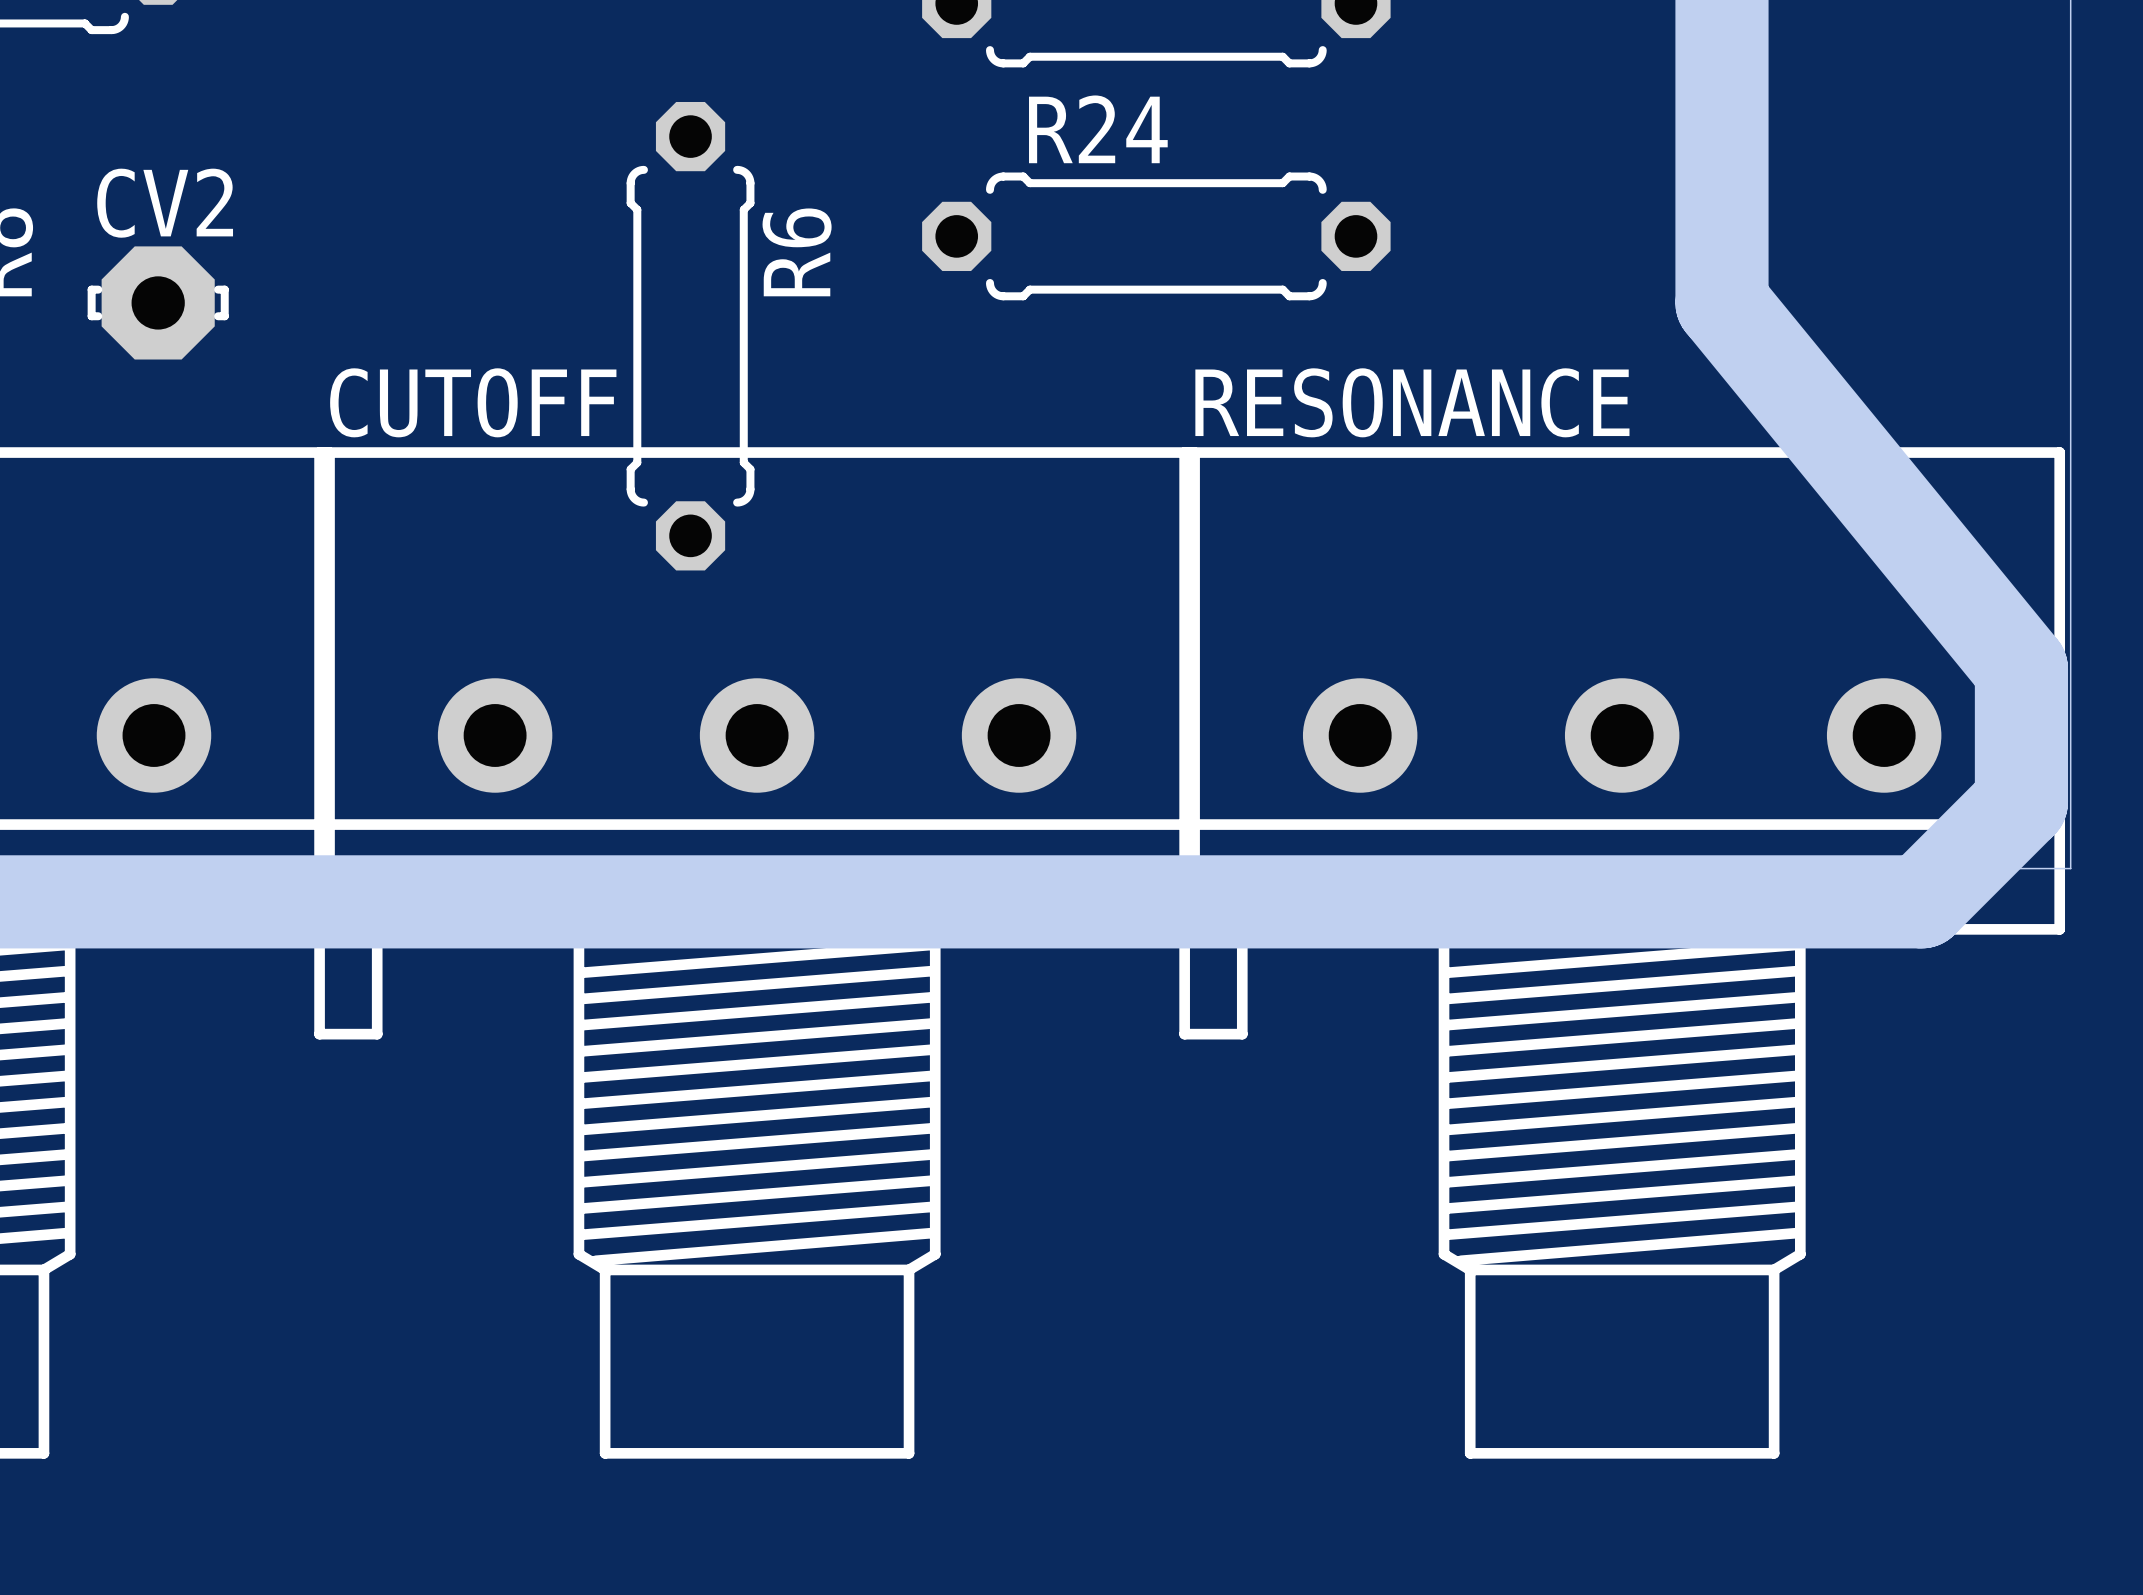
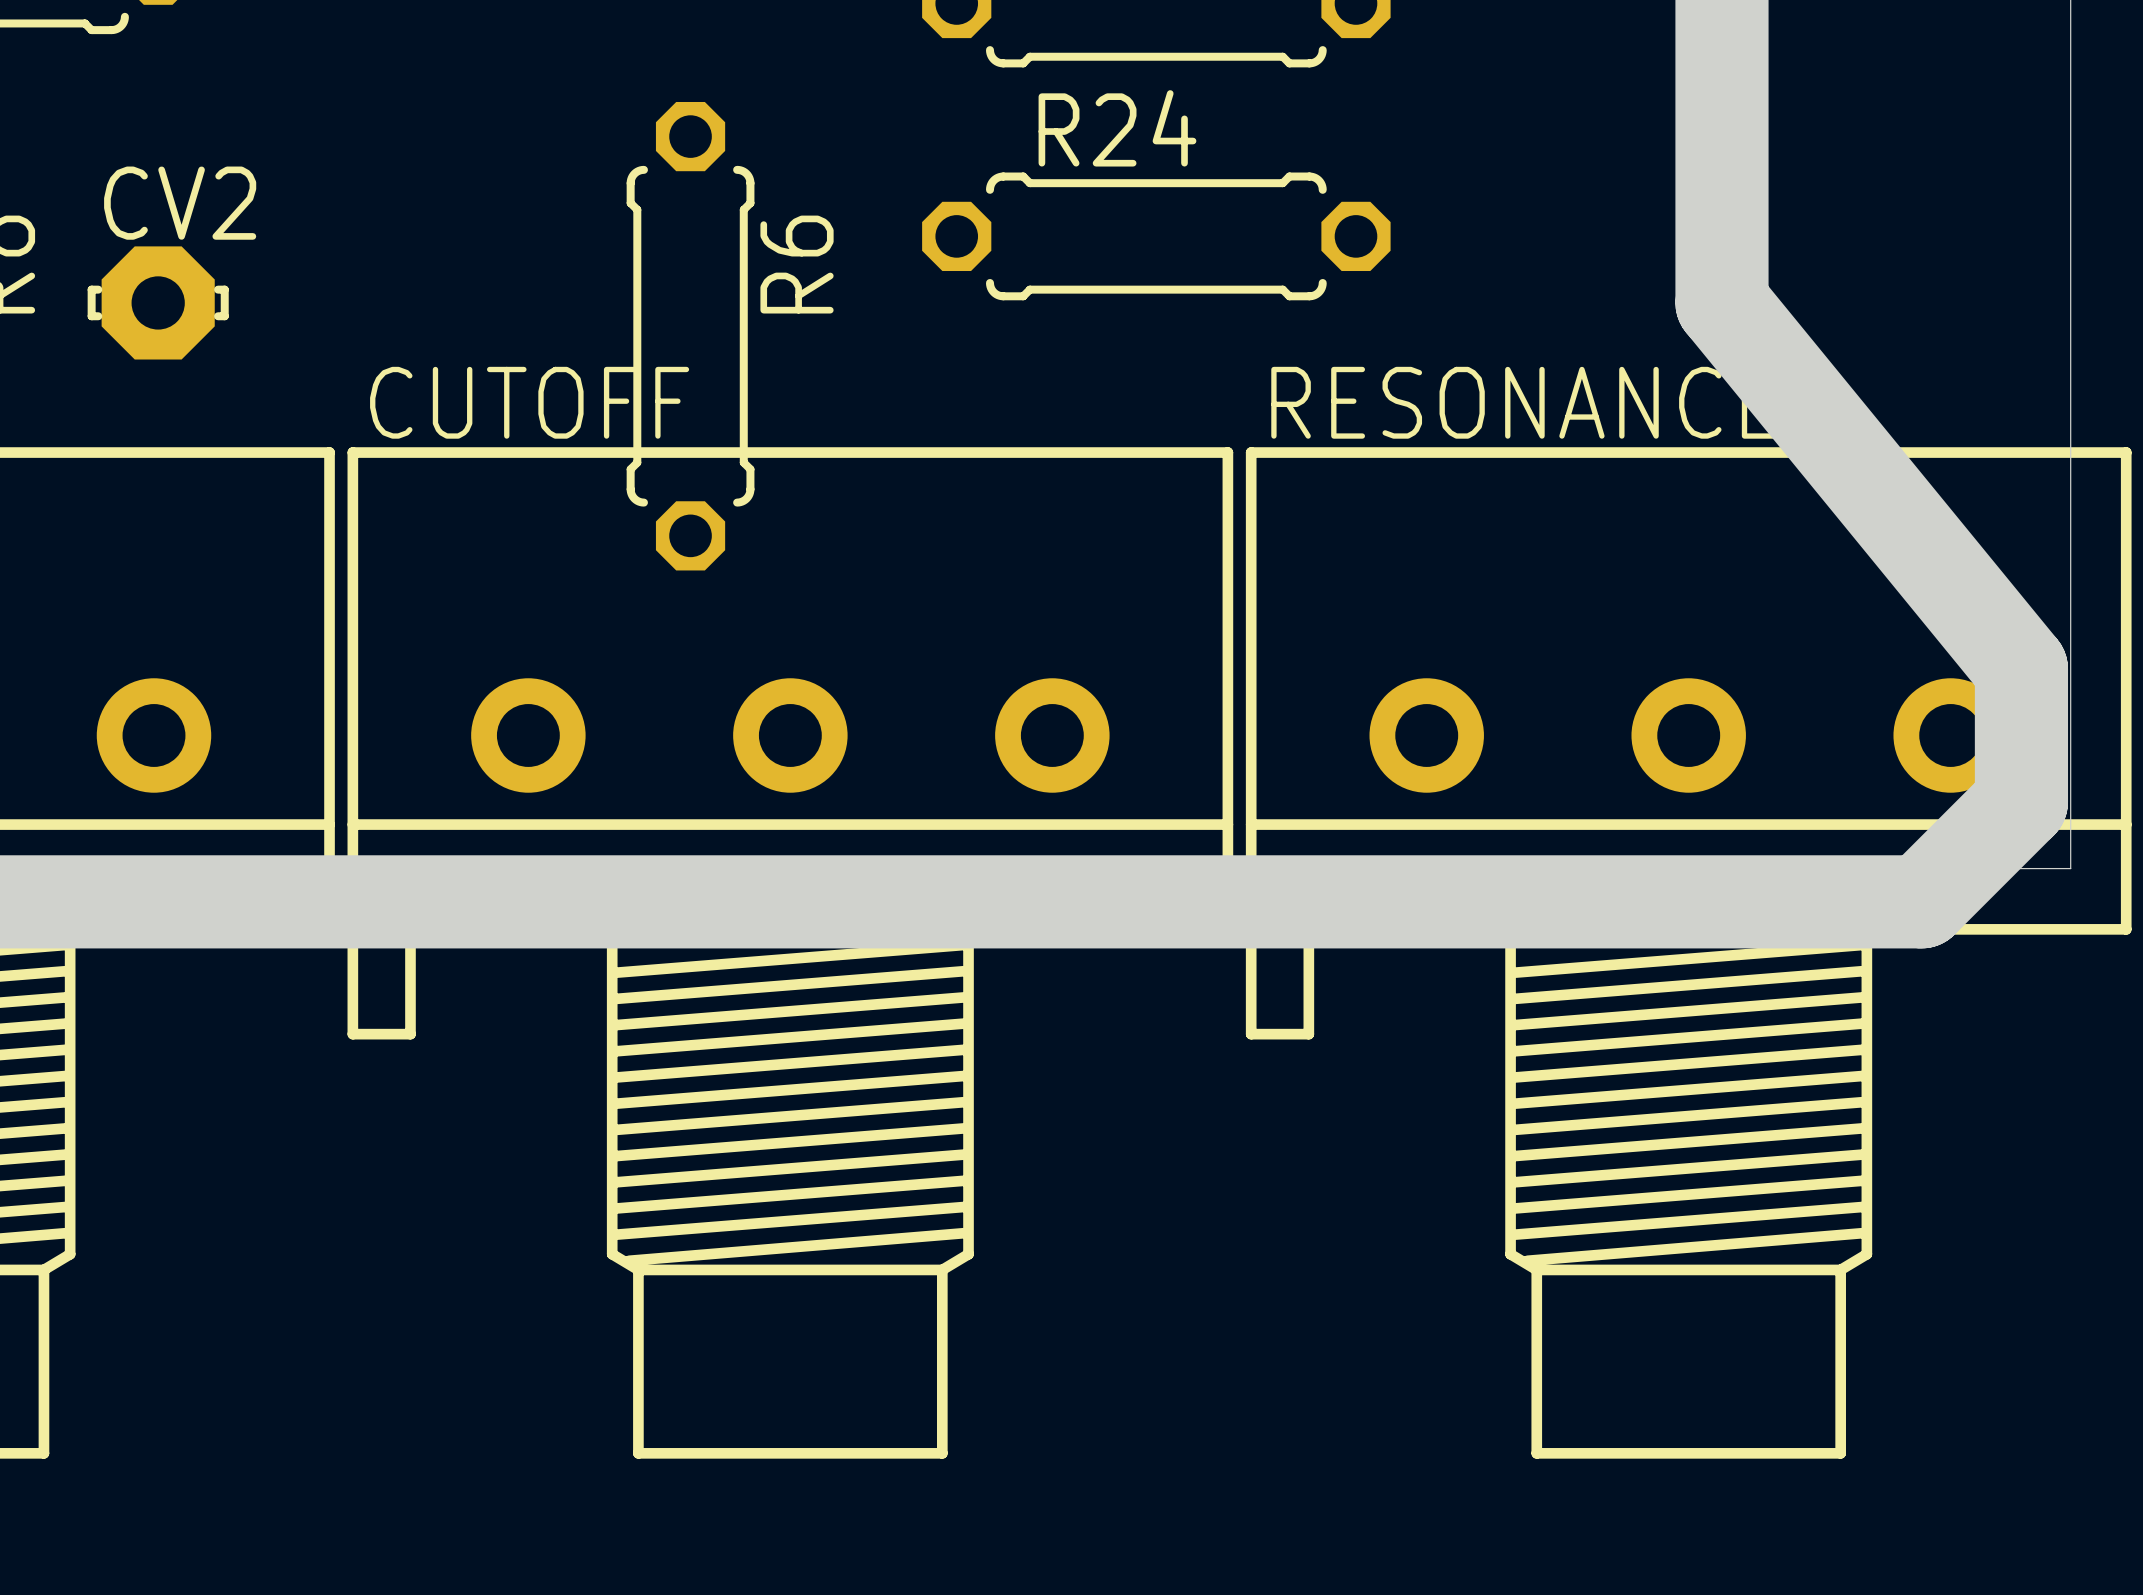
CUTOFF position: (757, 952) -> (790, 952)
RESONANCE position: (1622, 952) -> (1688, 952)

